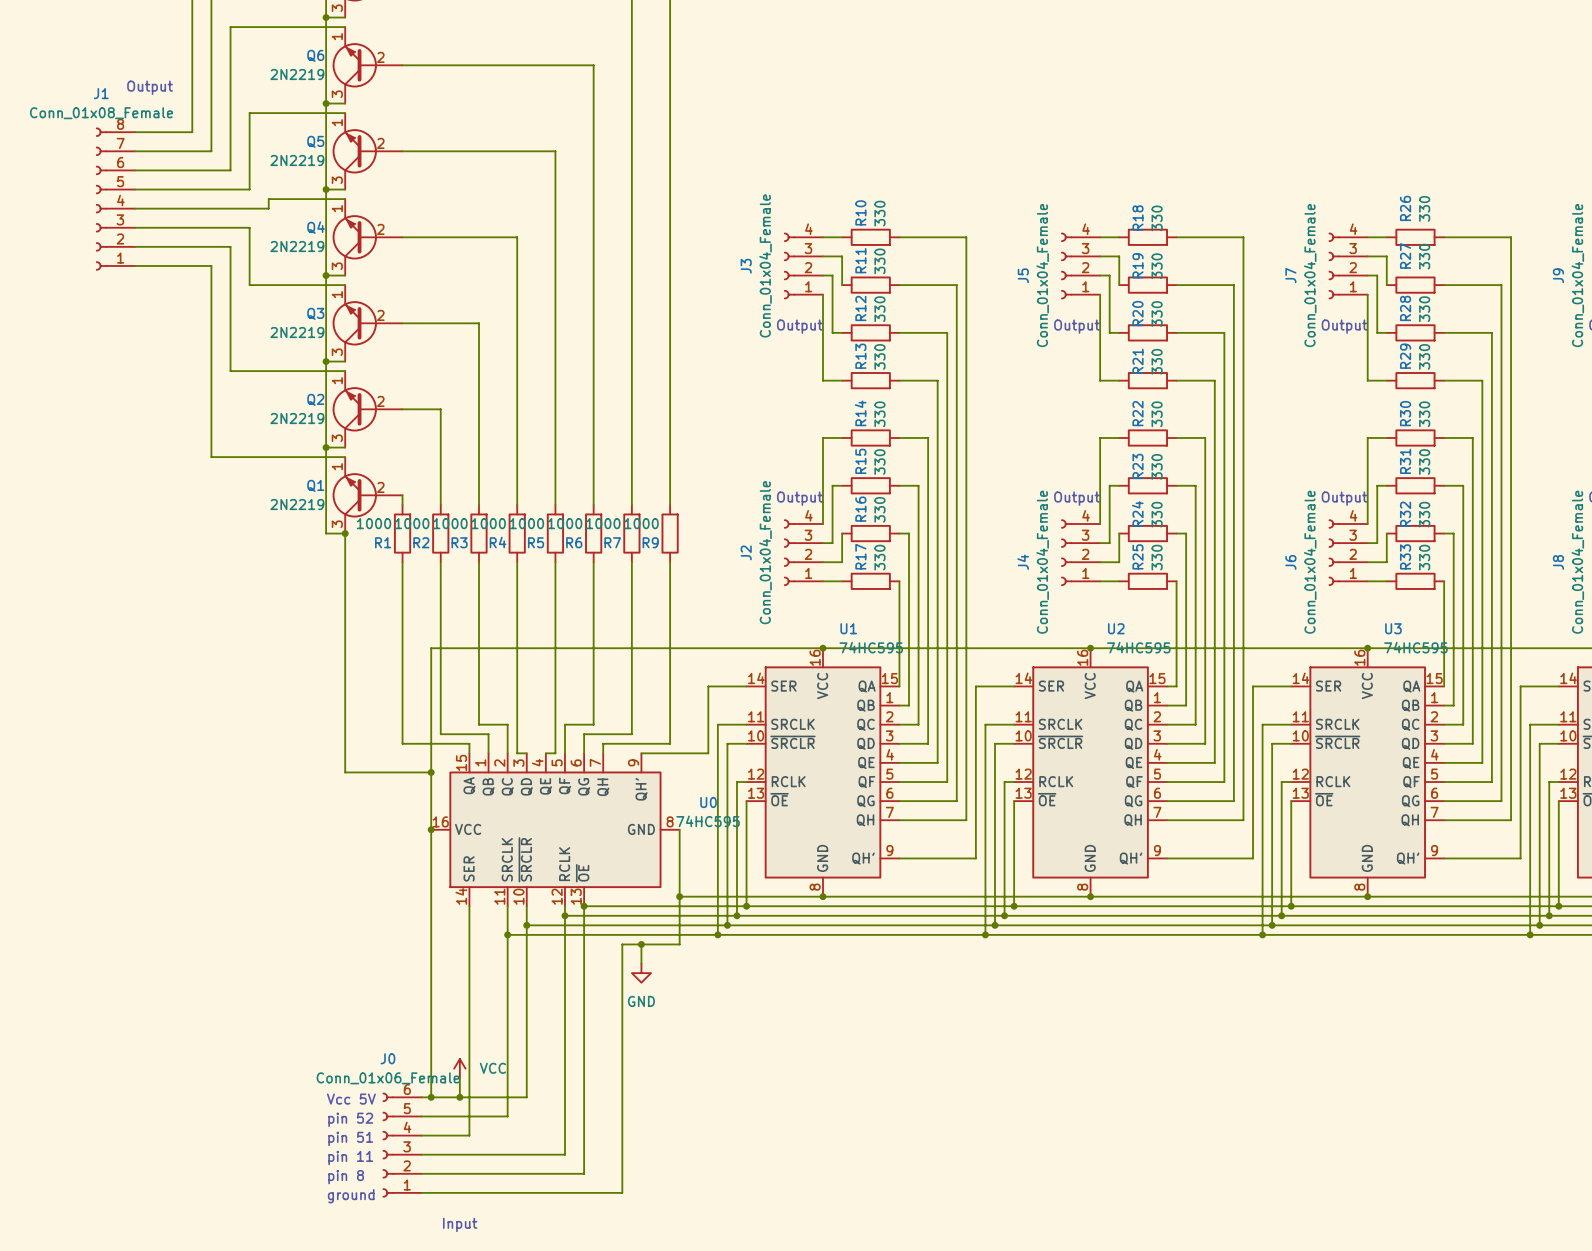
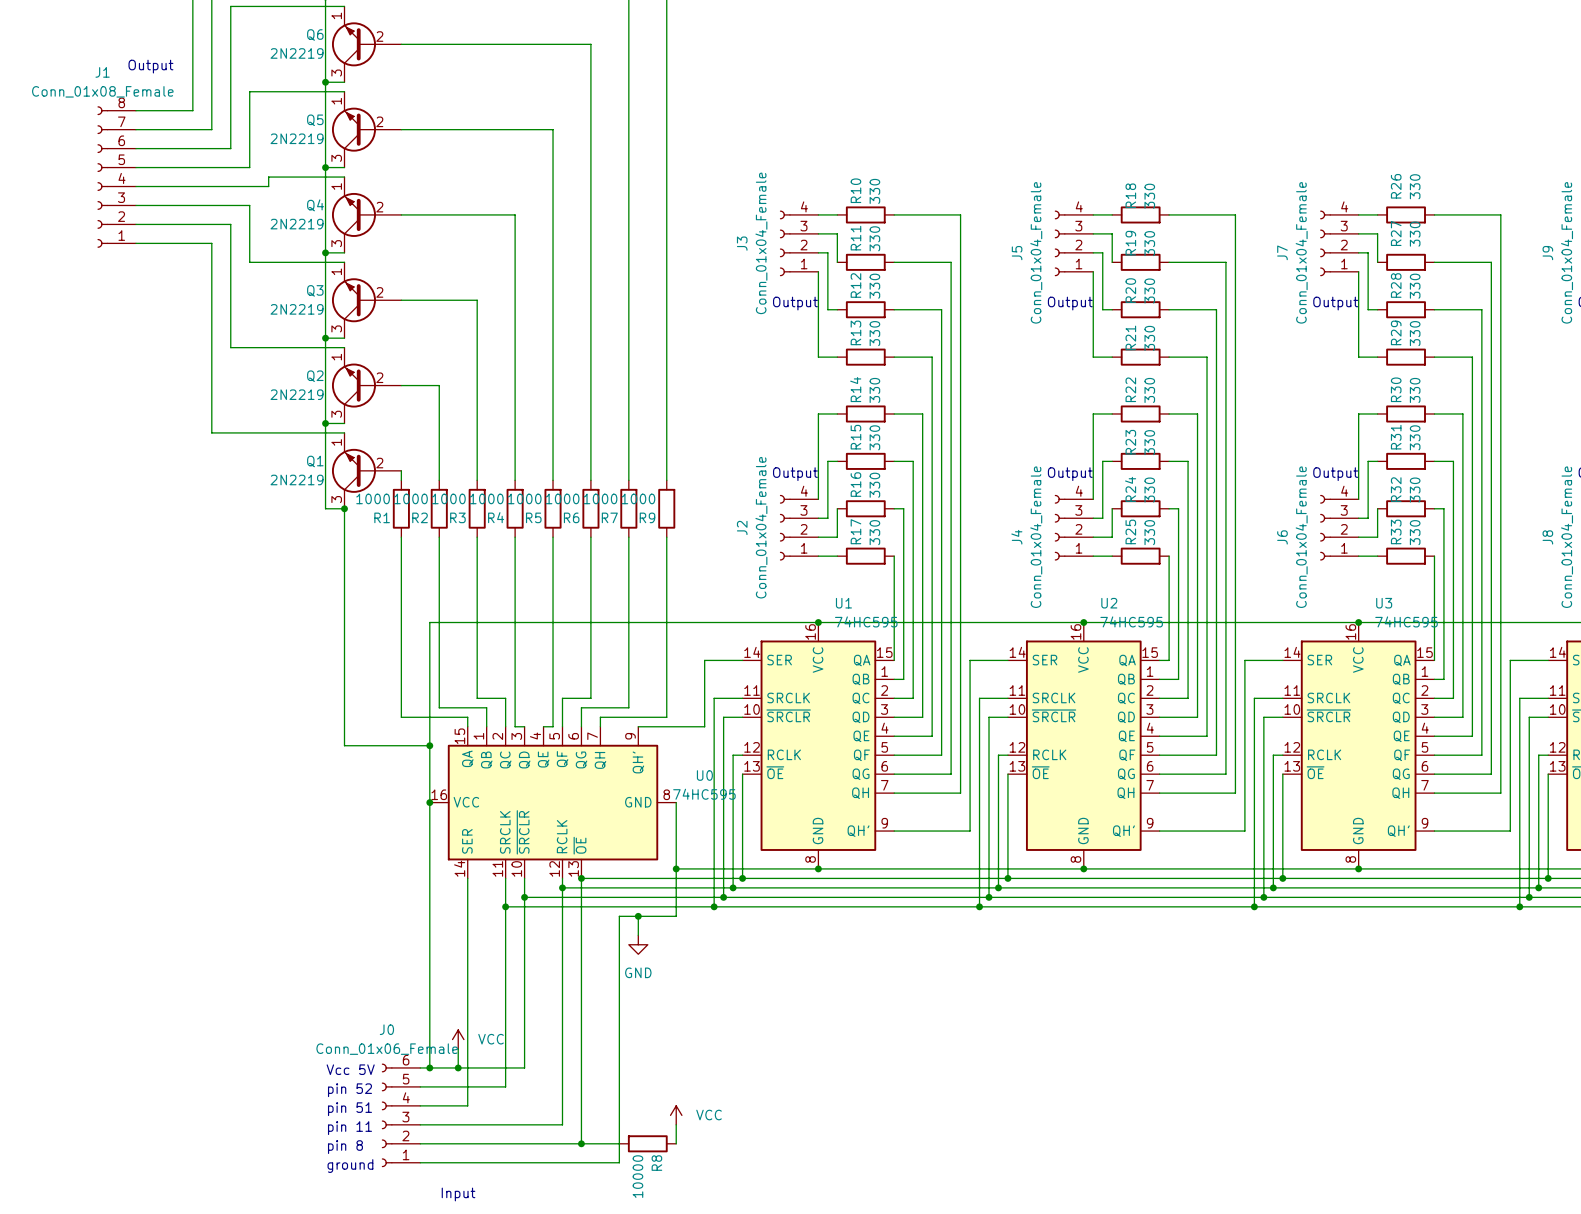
power symbol: none -> VCC (676, 1115)
wire: none -> (676, 1124) (676, 1143)
wire: none -> (581, 1143) (619, 1143)
junction: none -> (581, 1143)
R8: none -> 10000 (647, 1143)

